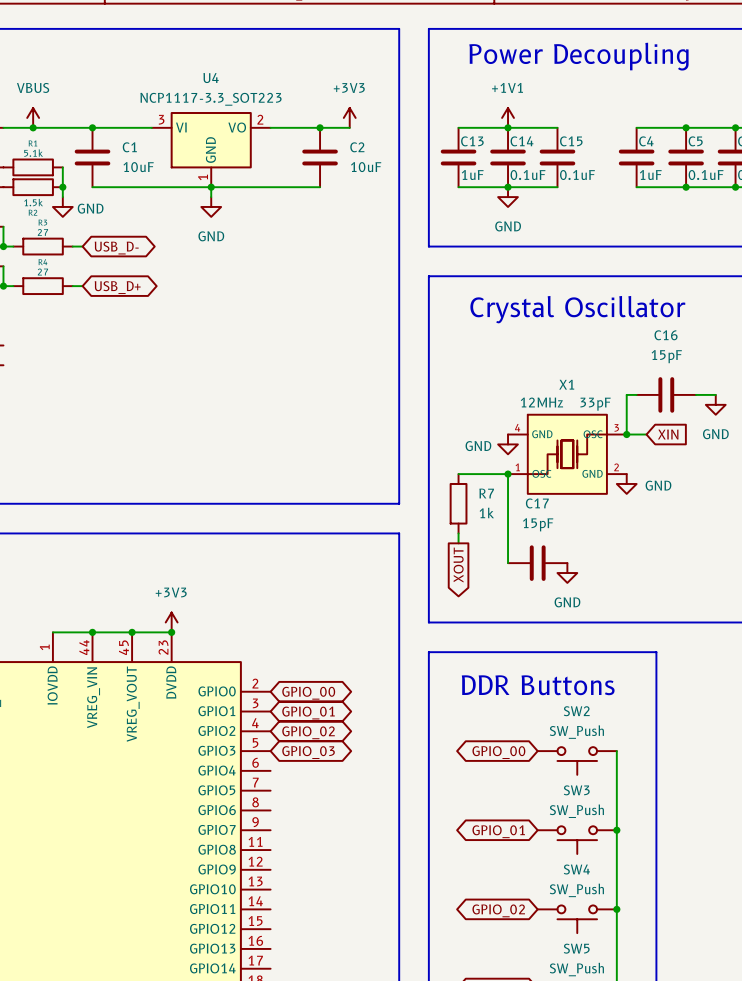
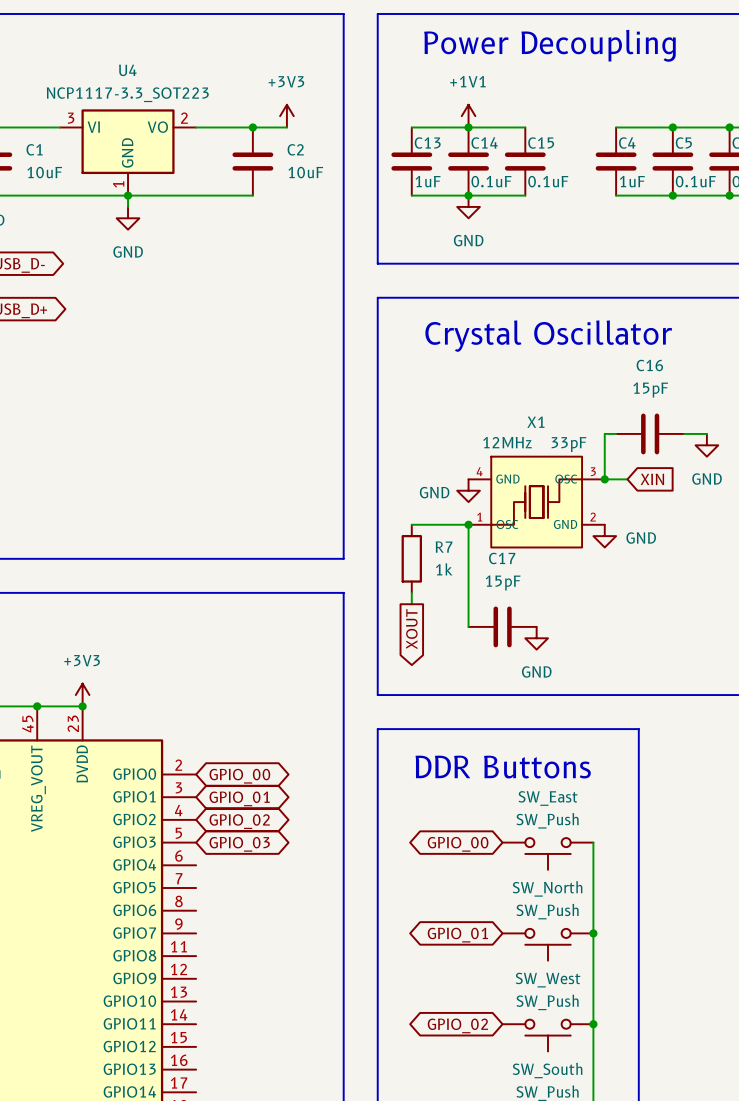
SW2 name: SW2 (576, 711) -> SW_East (548, 798)
SW3 name: SW3 (576, 790) -> SW_North (547, 888)
SW4 name: SW4 (576, 869) -> SW_West (548, 980)
SW5 name: SW5 (576, 948) -> SW_South (547, 1070)

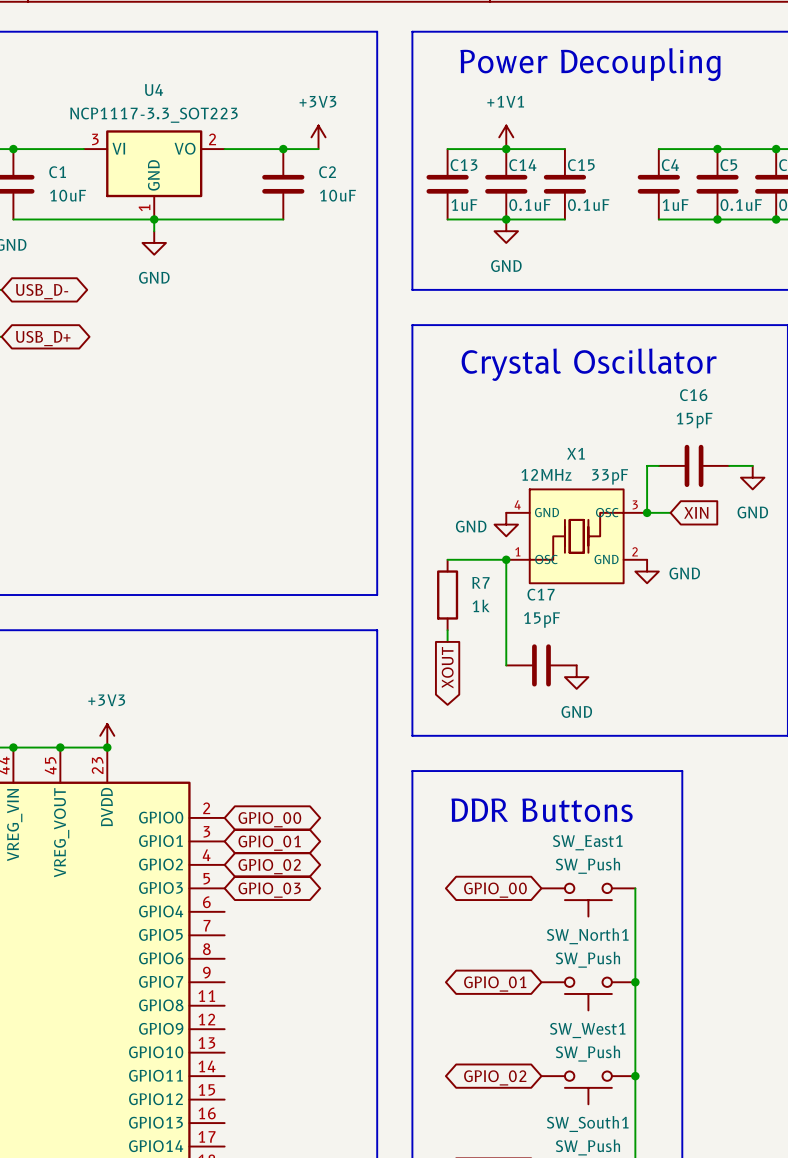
SW_East name: SW_East (548, 798) -> SW_East1 (587, 842)
SW_North name: SW_North (547, 888) -> SW_North1 (587, 936)
SW_West name: SW_West (548, 980) -> SW_West1 (587, 1030)
SW_South name: SW_South (547, 1070) -> SW_South1 (587, 1124)

